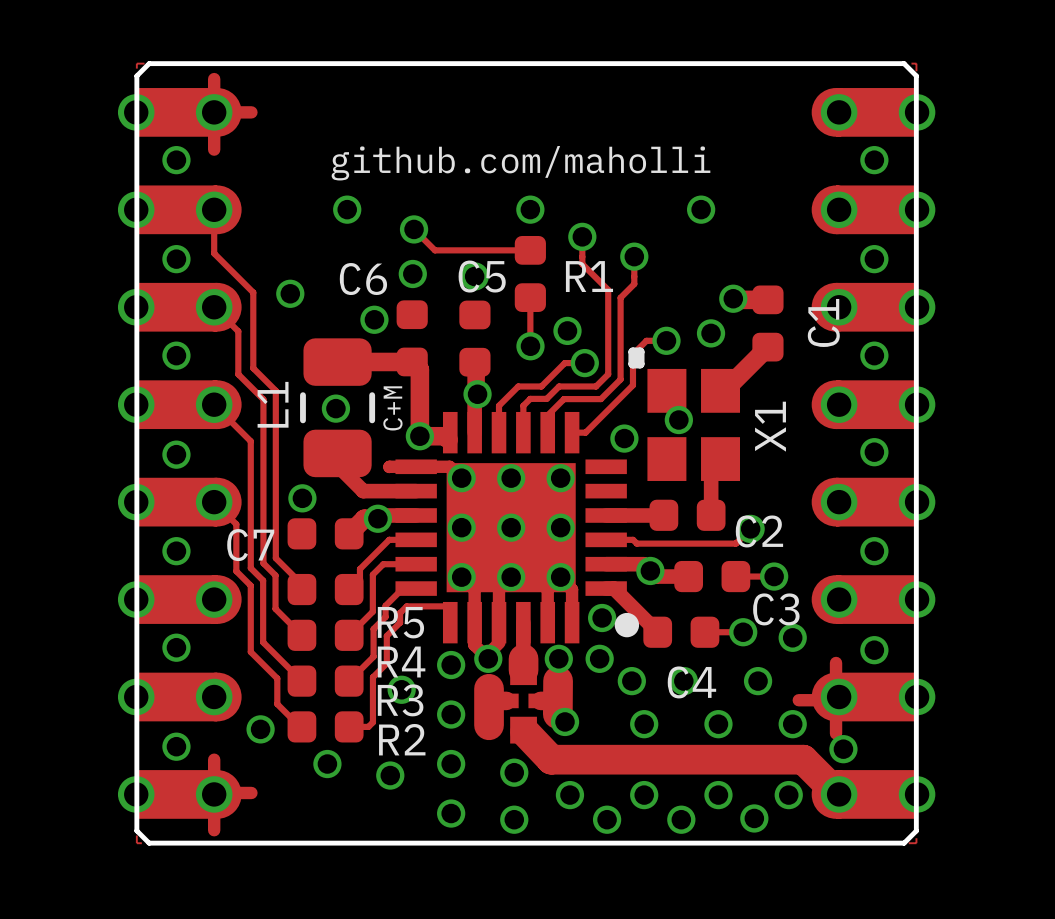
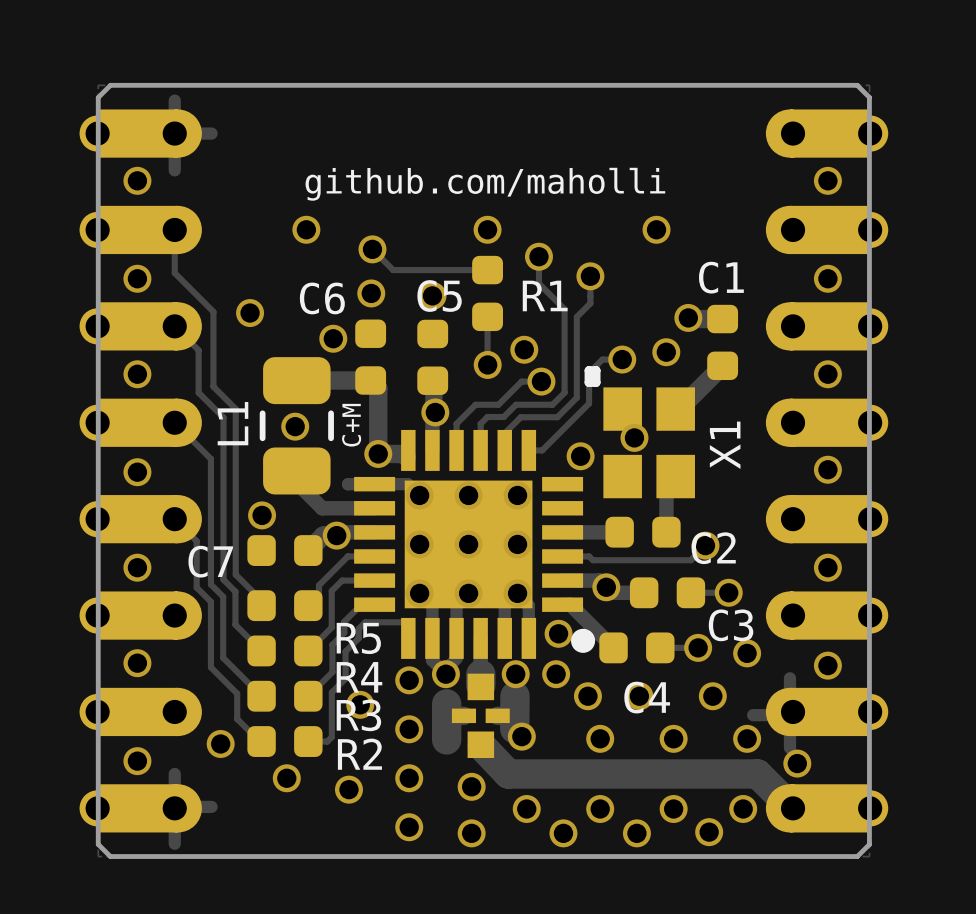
C1 name rotation: 0° (823, 322) -> 90° clockwise (721, 277)
C1 name position: C1 (823, 322) -> C1 (721, 277)

